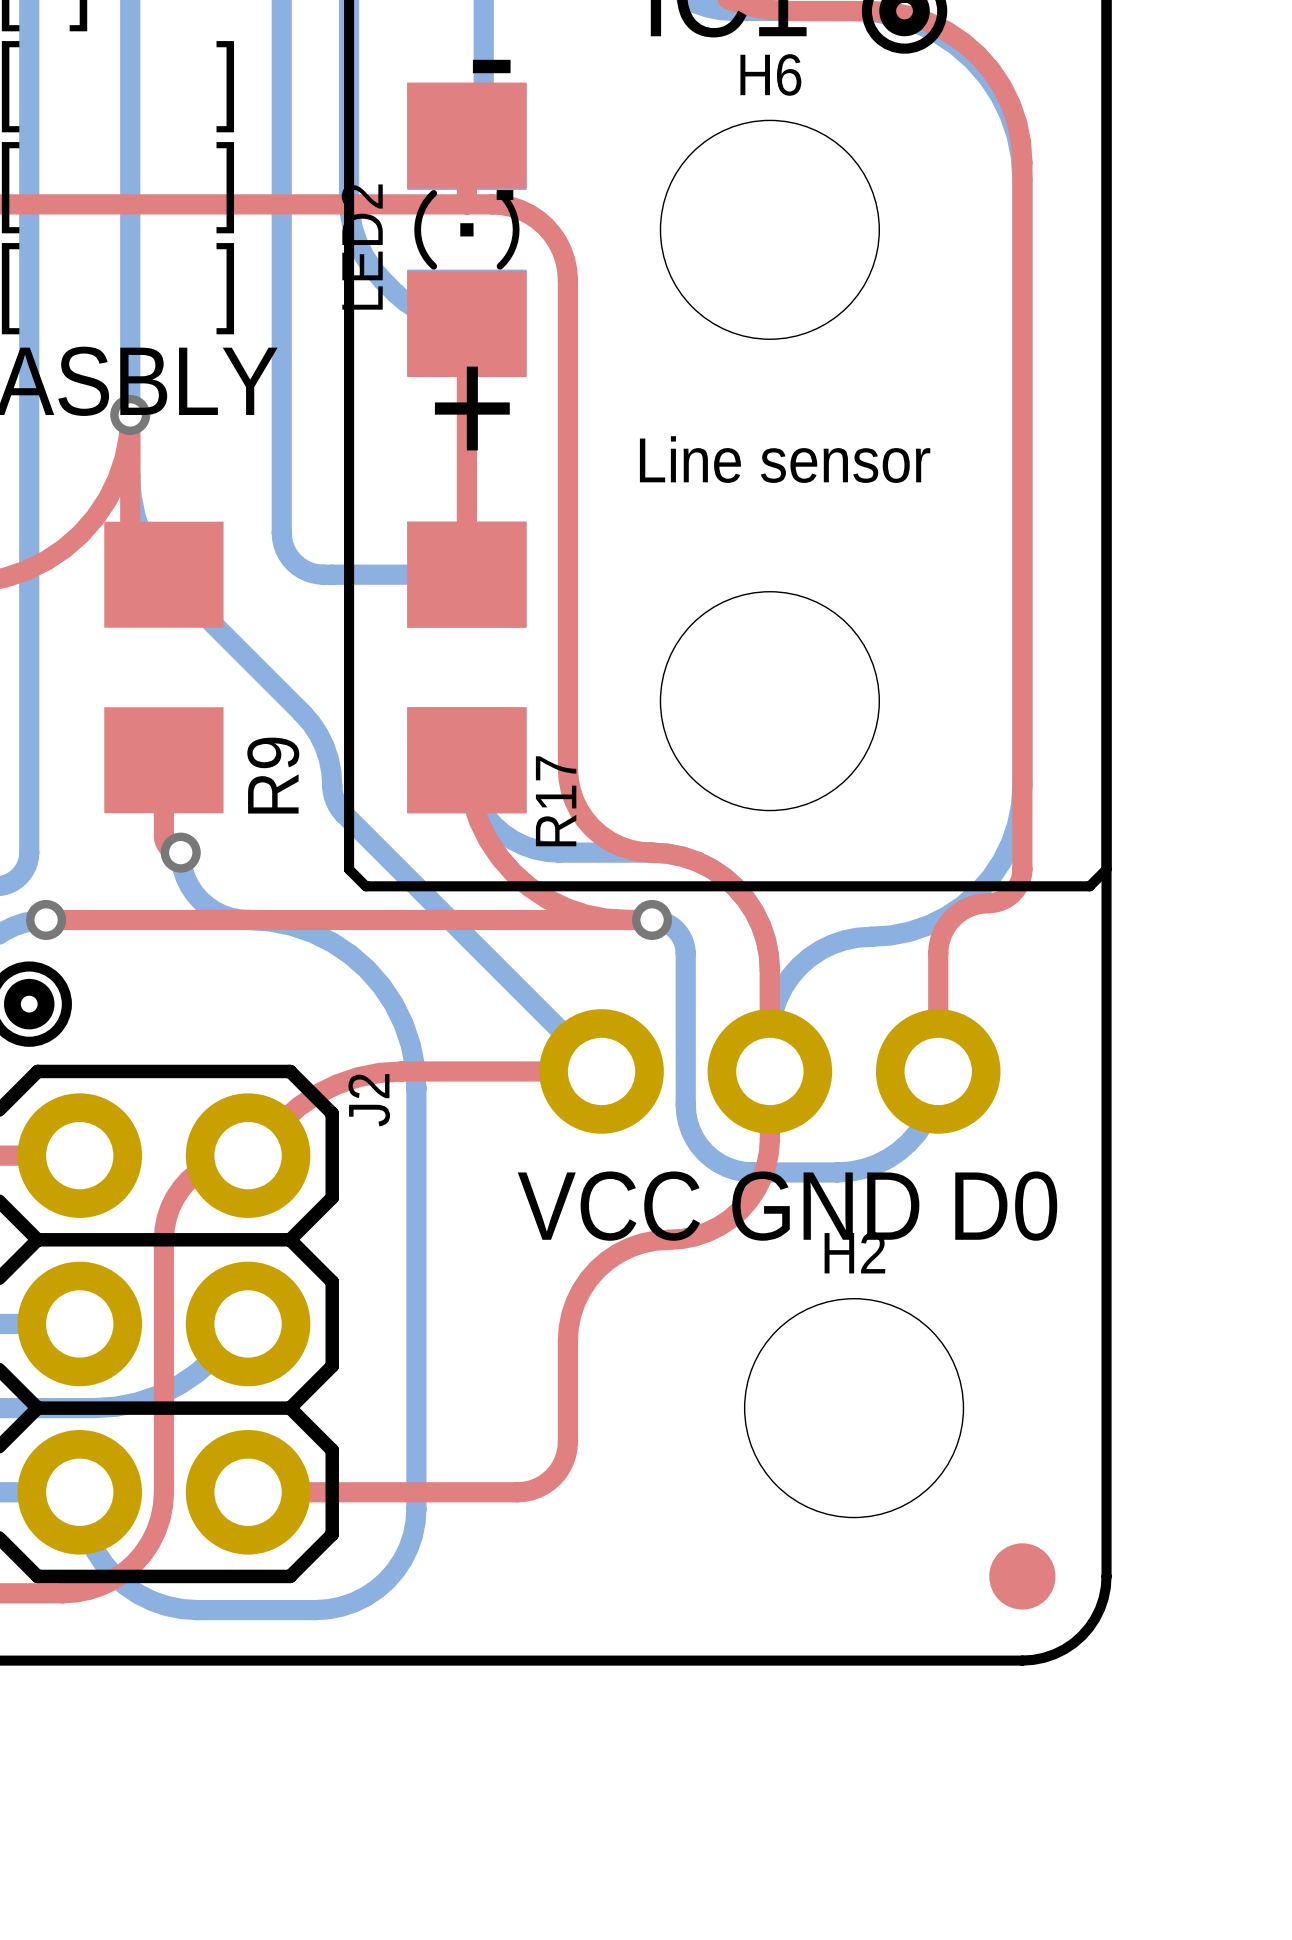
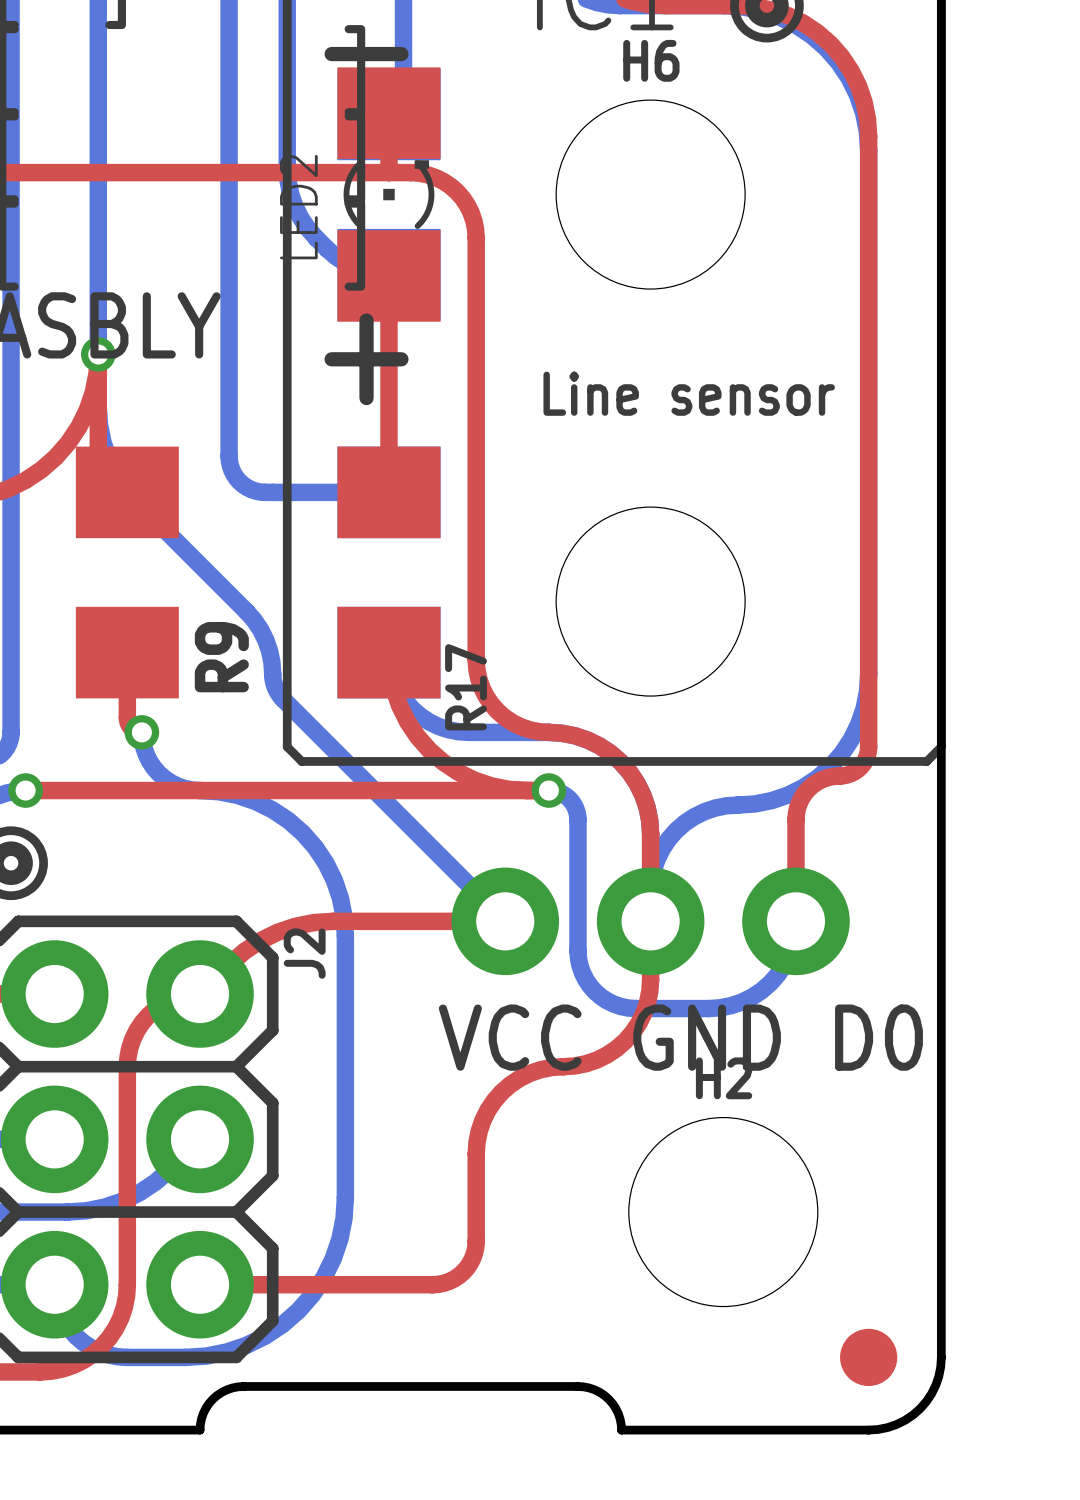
bottom track: (416, 1391) (416, 1509) (412, 1535) (408, 1547) (402, 1559) (386, 1580) (365, 1596) (341, 1606) (315, 1610) (197, 1610) (167, 1606) (152, 1601) (125, 1585) (114, 1575) (95, 1551) (83, 1522) (79, 1492) -> (345, 1197) (339, 1238) (333, 1258) (312, 1294) (282, 1324) (246, 1345) (226, 1351) (185, 1357) (127, 1357) (99, 1351) (83, 1342) (69, 1328) (57, 1303) (54, 1284)
board edge: (248, 1660) (736, 1660) -> (200, 1430) (203, 1413) (212, 1399) (226, 1389) (243, 1386) (583, 1386) (599, 1392) (612, 1403) (618, 1413) (621, 1430)

